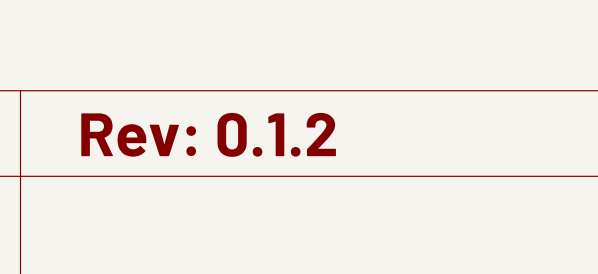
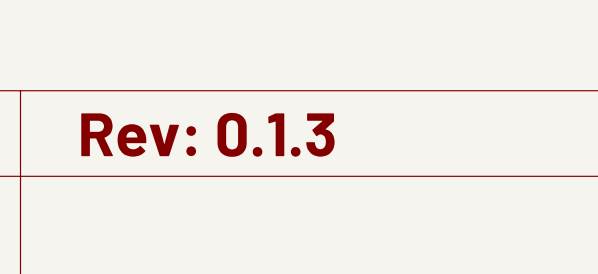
title block: Rev: 0.1.2 (208, 134) -> Rev: 0.1.3 (207, 134)

